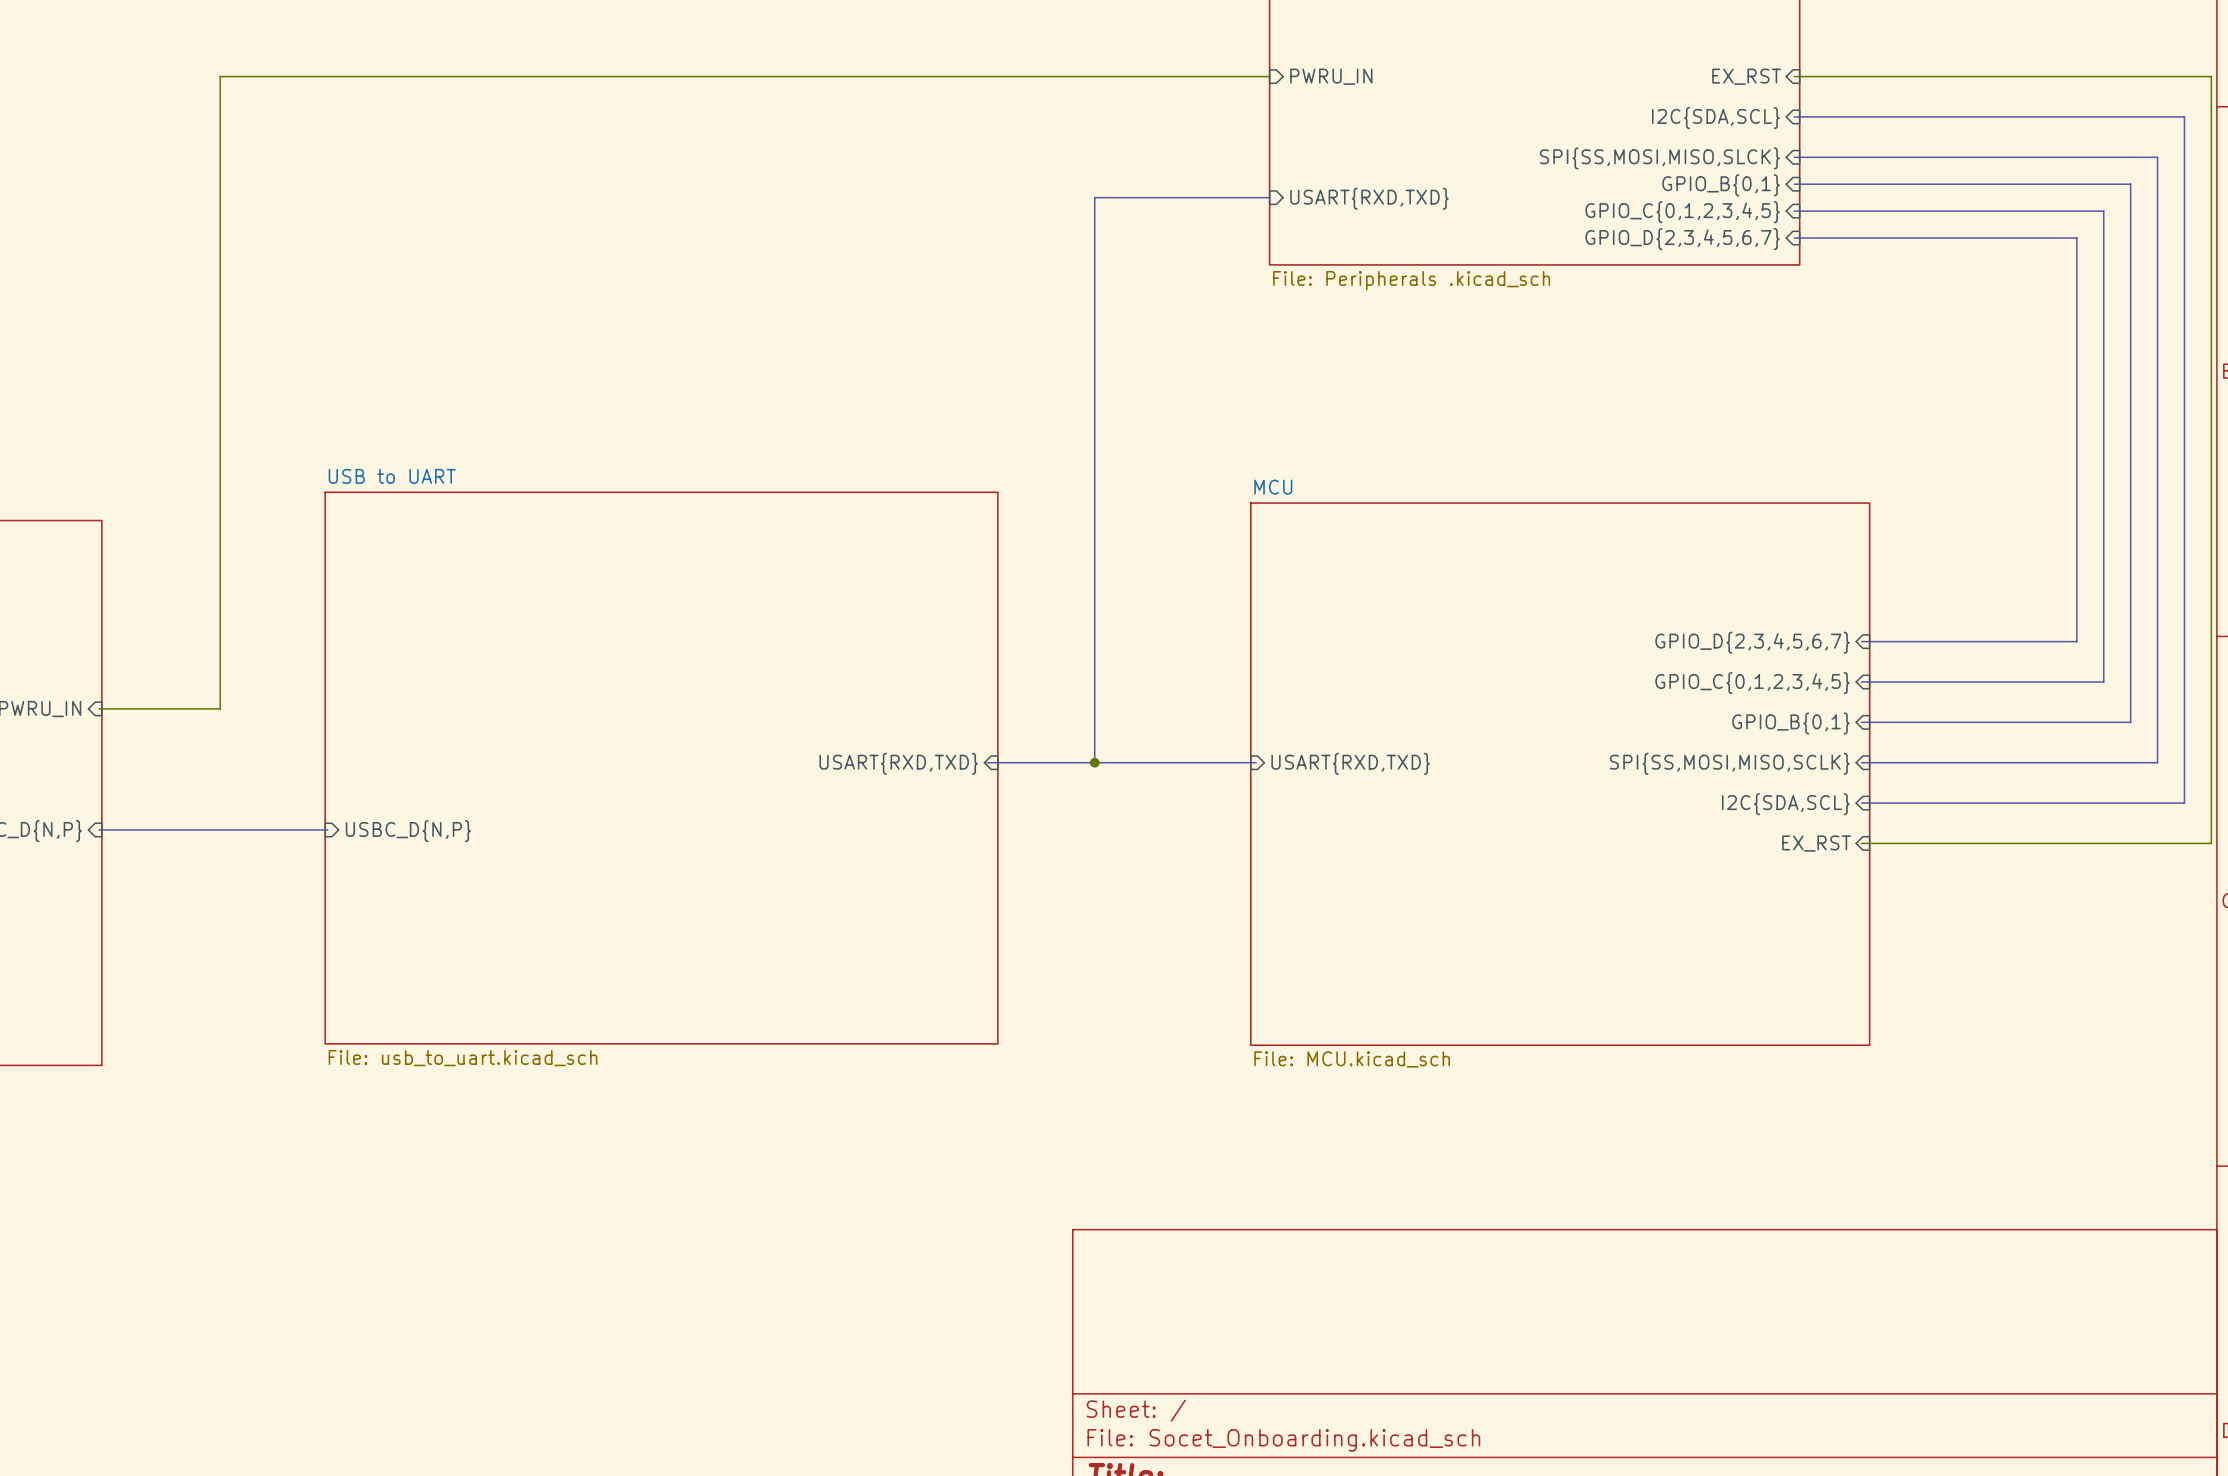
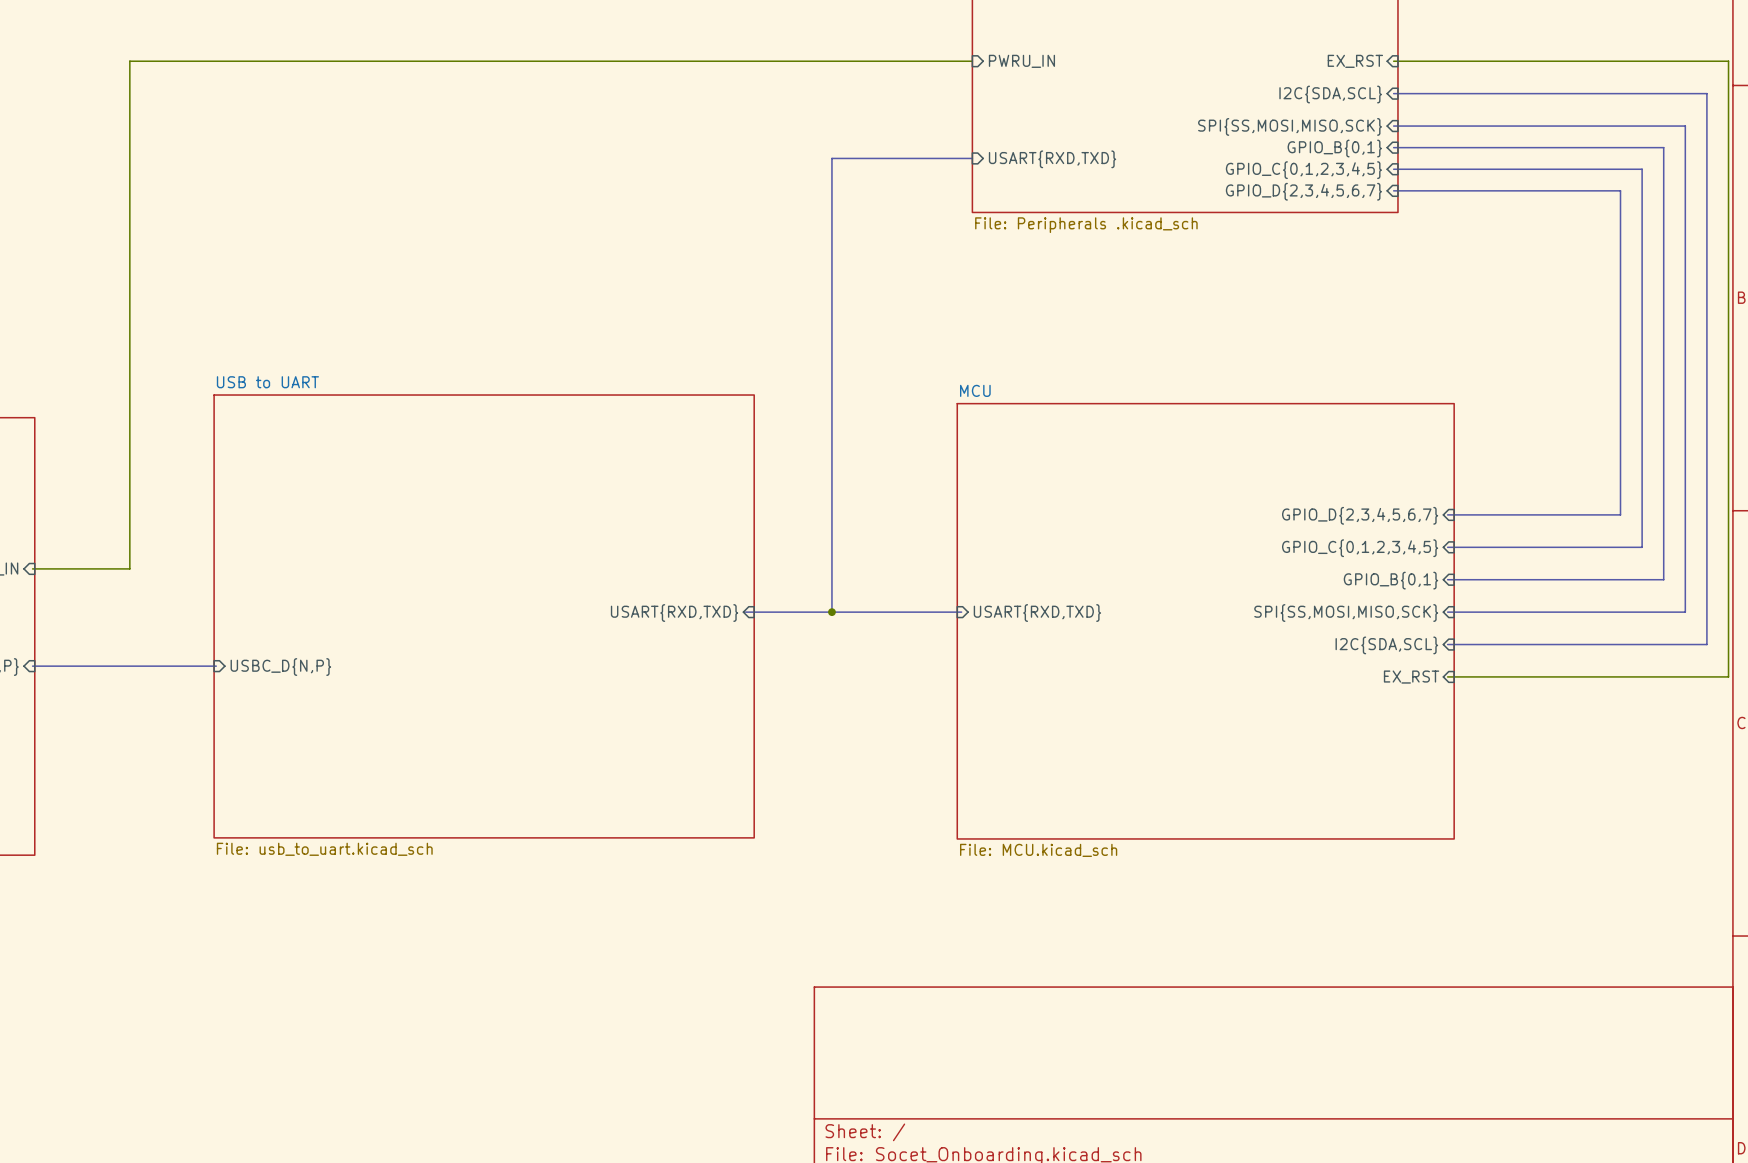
sheet pin: SPI{SS,MOSI,MISO,SLCK} (1659, 158) -> SPI{SS,MOSI,MISO,SCK} (1290, 126)
sheet pin: SPI{SS,MOSI,MISO,SCLK} (1729, 763) -> SPI{SS,MOSI,MISO,SCK} (1346, 613)

